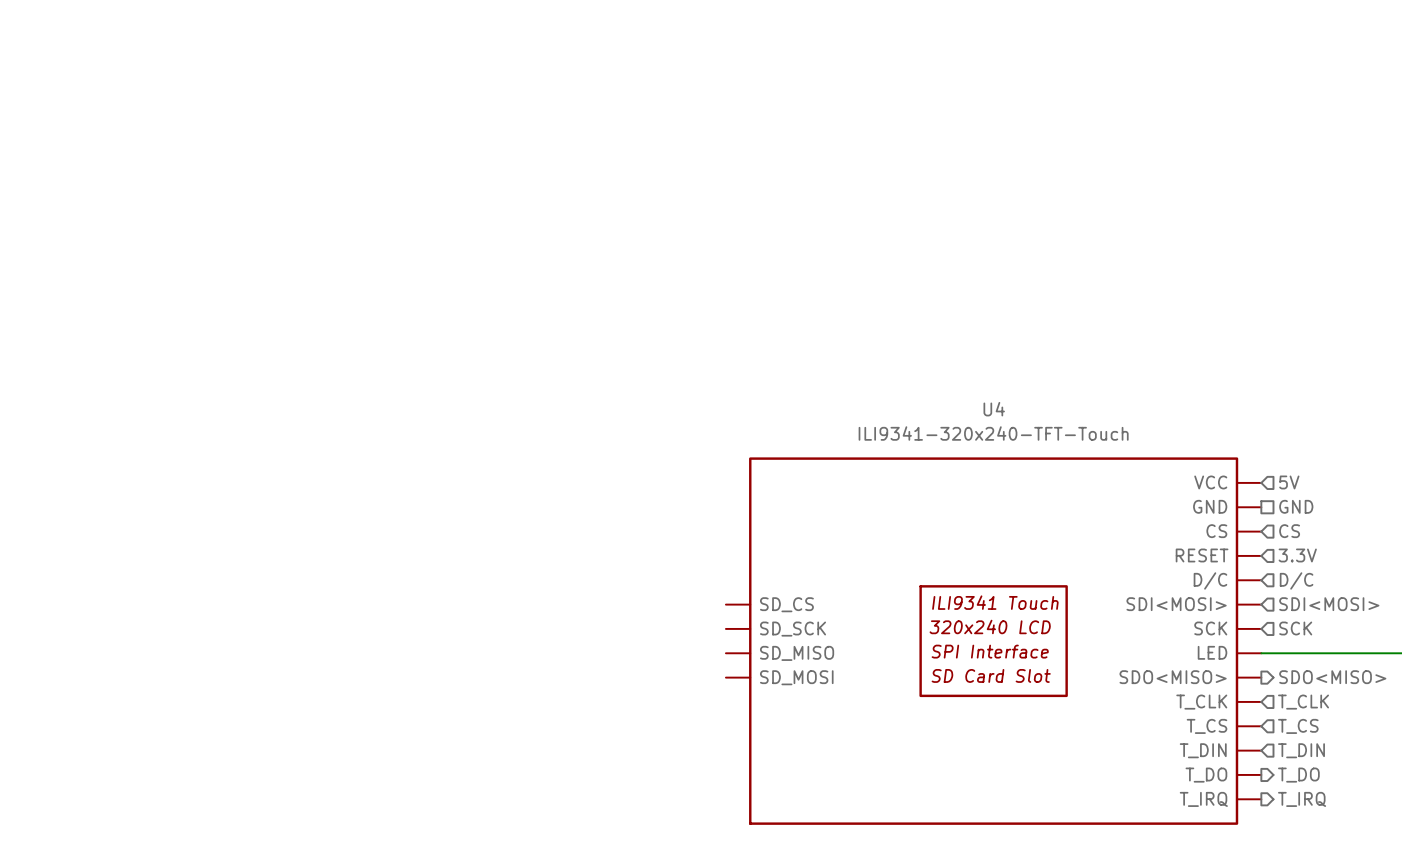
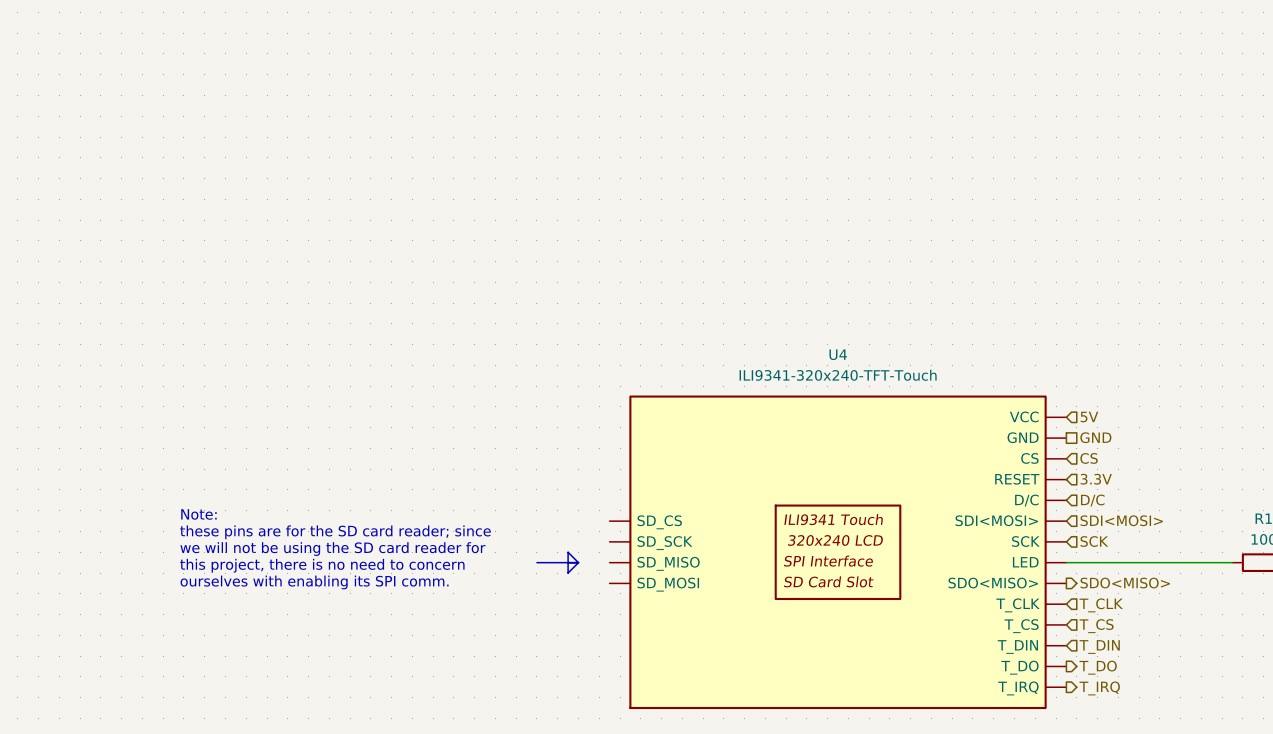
text: none -> Note: (198, 514)
text: none -> these pins are for the SD card reader; since (335, 532)
text: none -> we will not be using the SD card reader for (332, 549)
line: none -> (536, 562) (578, 562)
line: none -> (578, 562) (568, 573) (568, 552) (578, 562)
text: none -> this project, there is no need to concern (322, 565)
text: none -> ourselves with enabling its SPI comm. (314, 582)

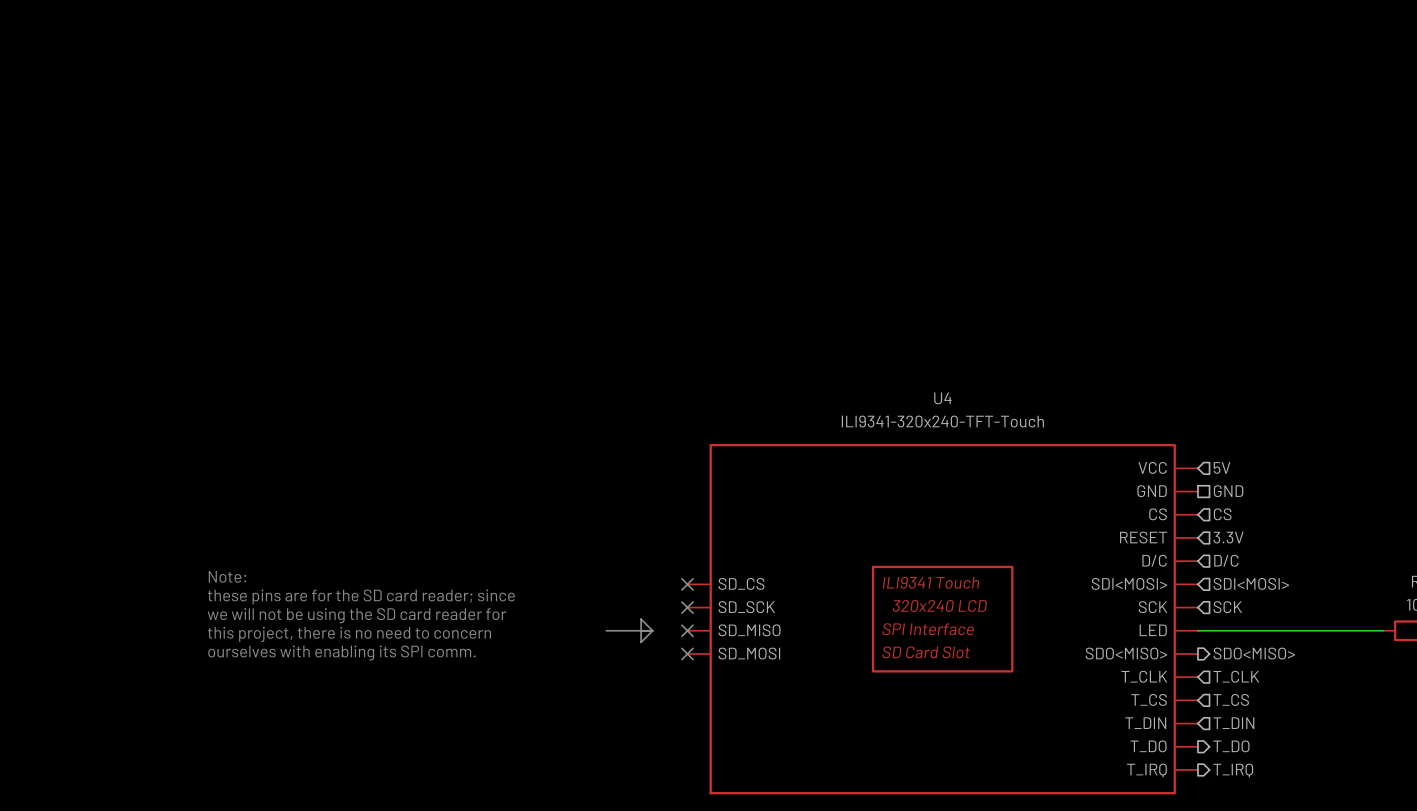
no-connect mark: none -> (687, 584)
no-connect mark: none -> (687, 607)
no-connect mark: none -> (687, 630)
no-connect mark: none -> (687, 653)

